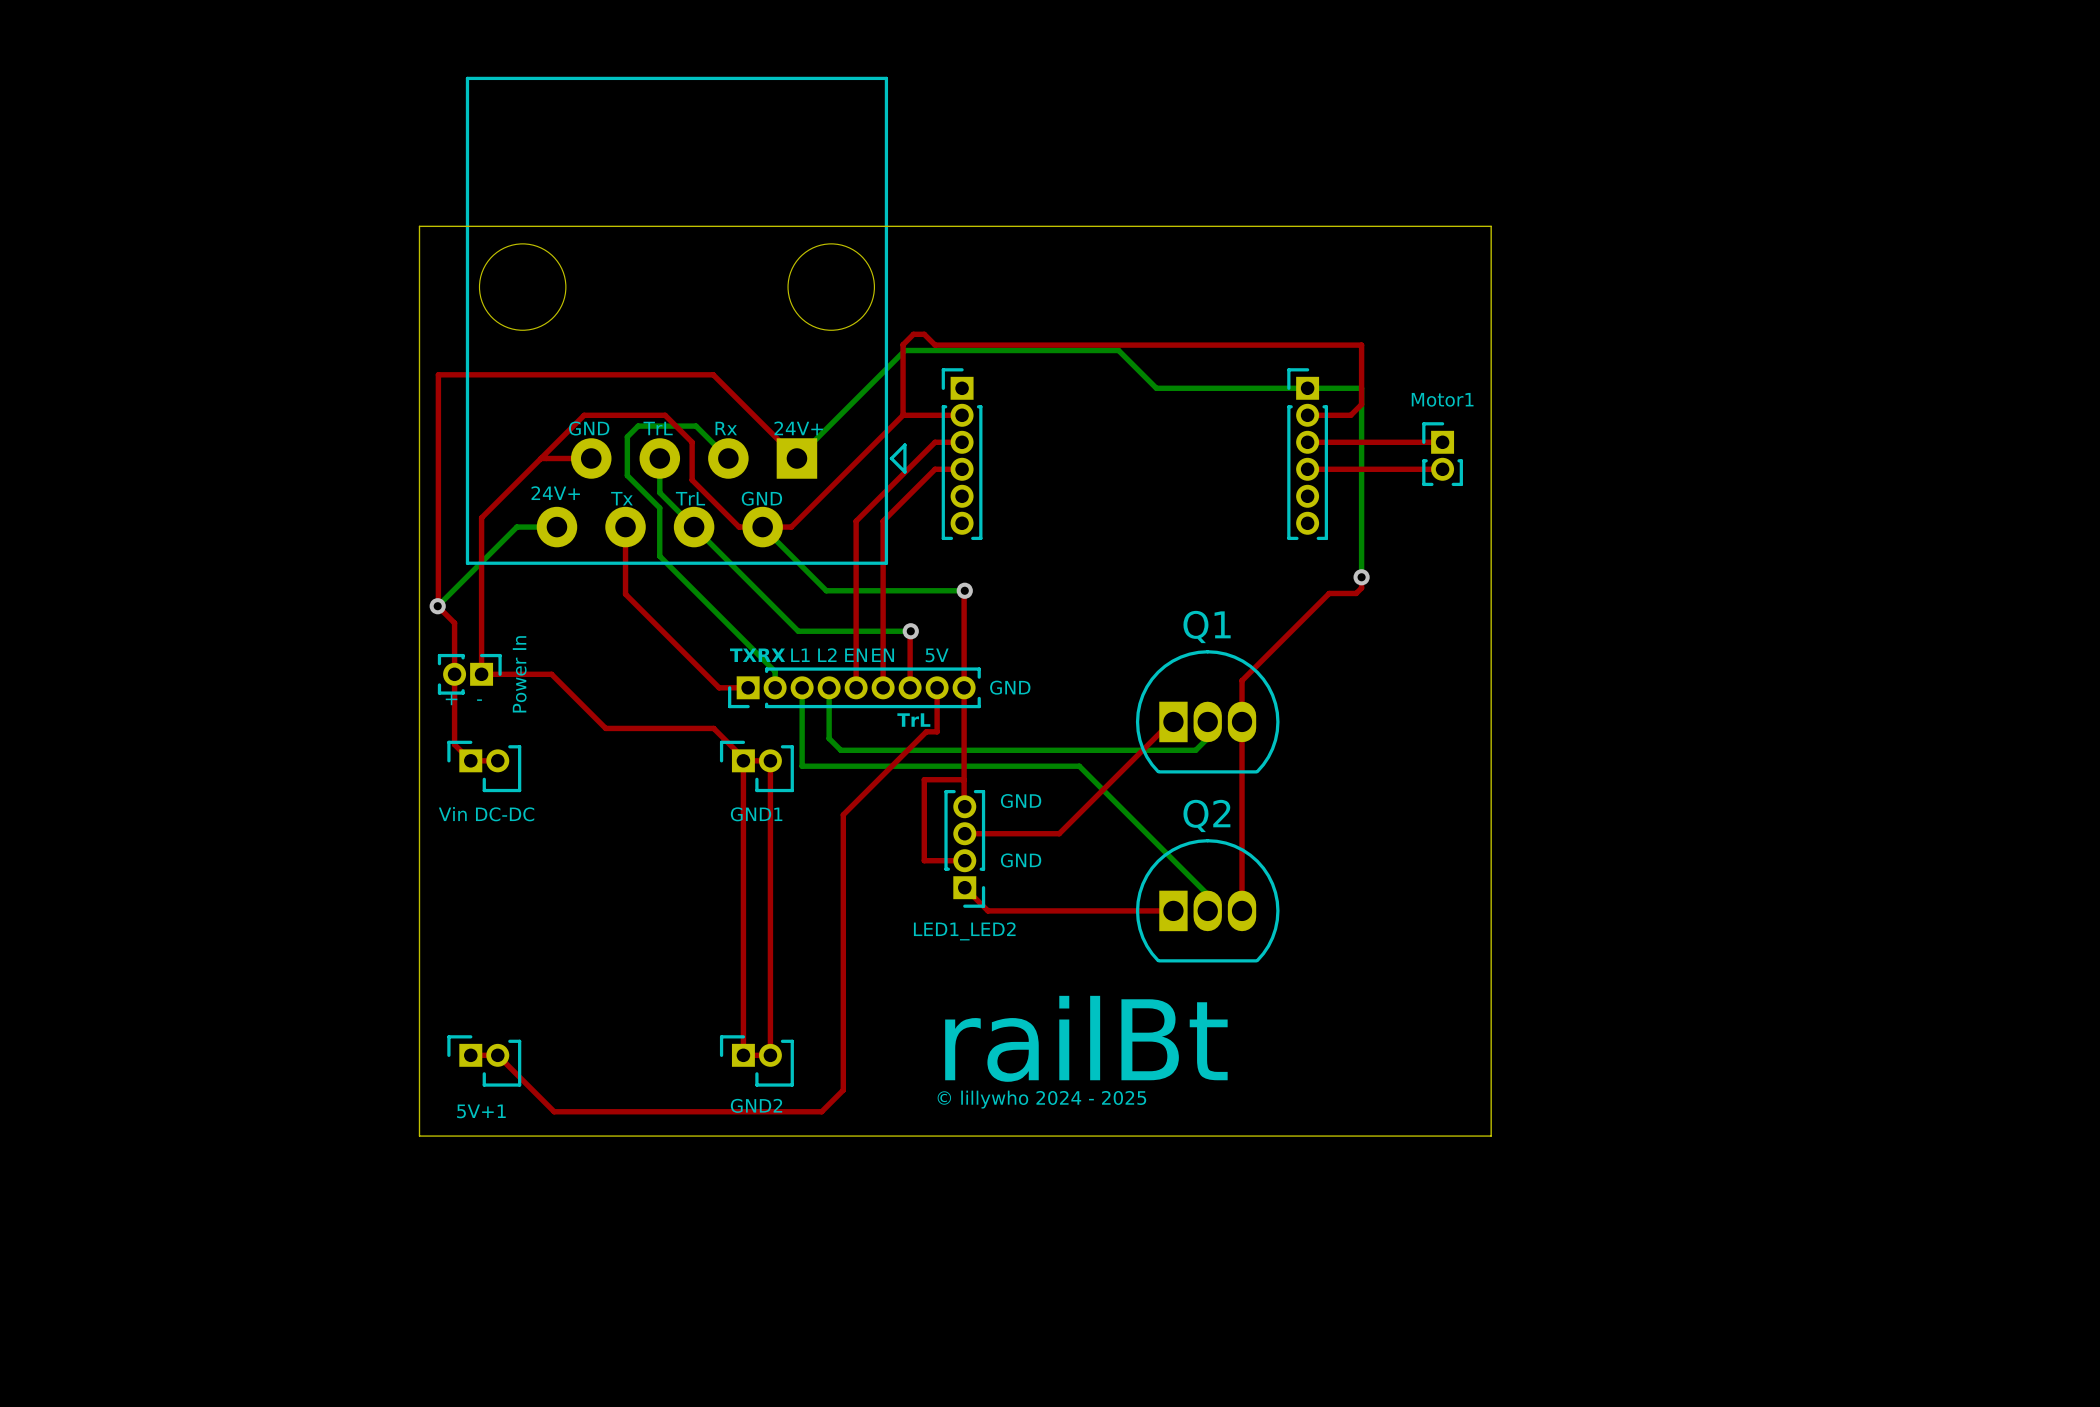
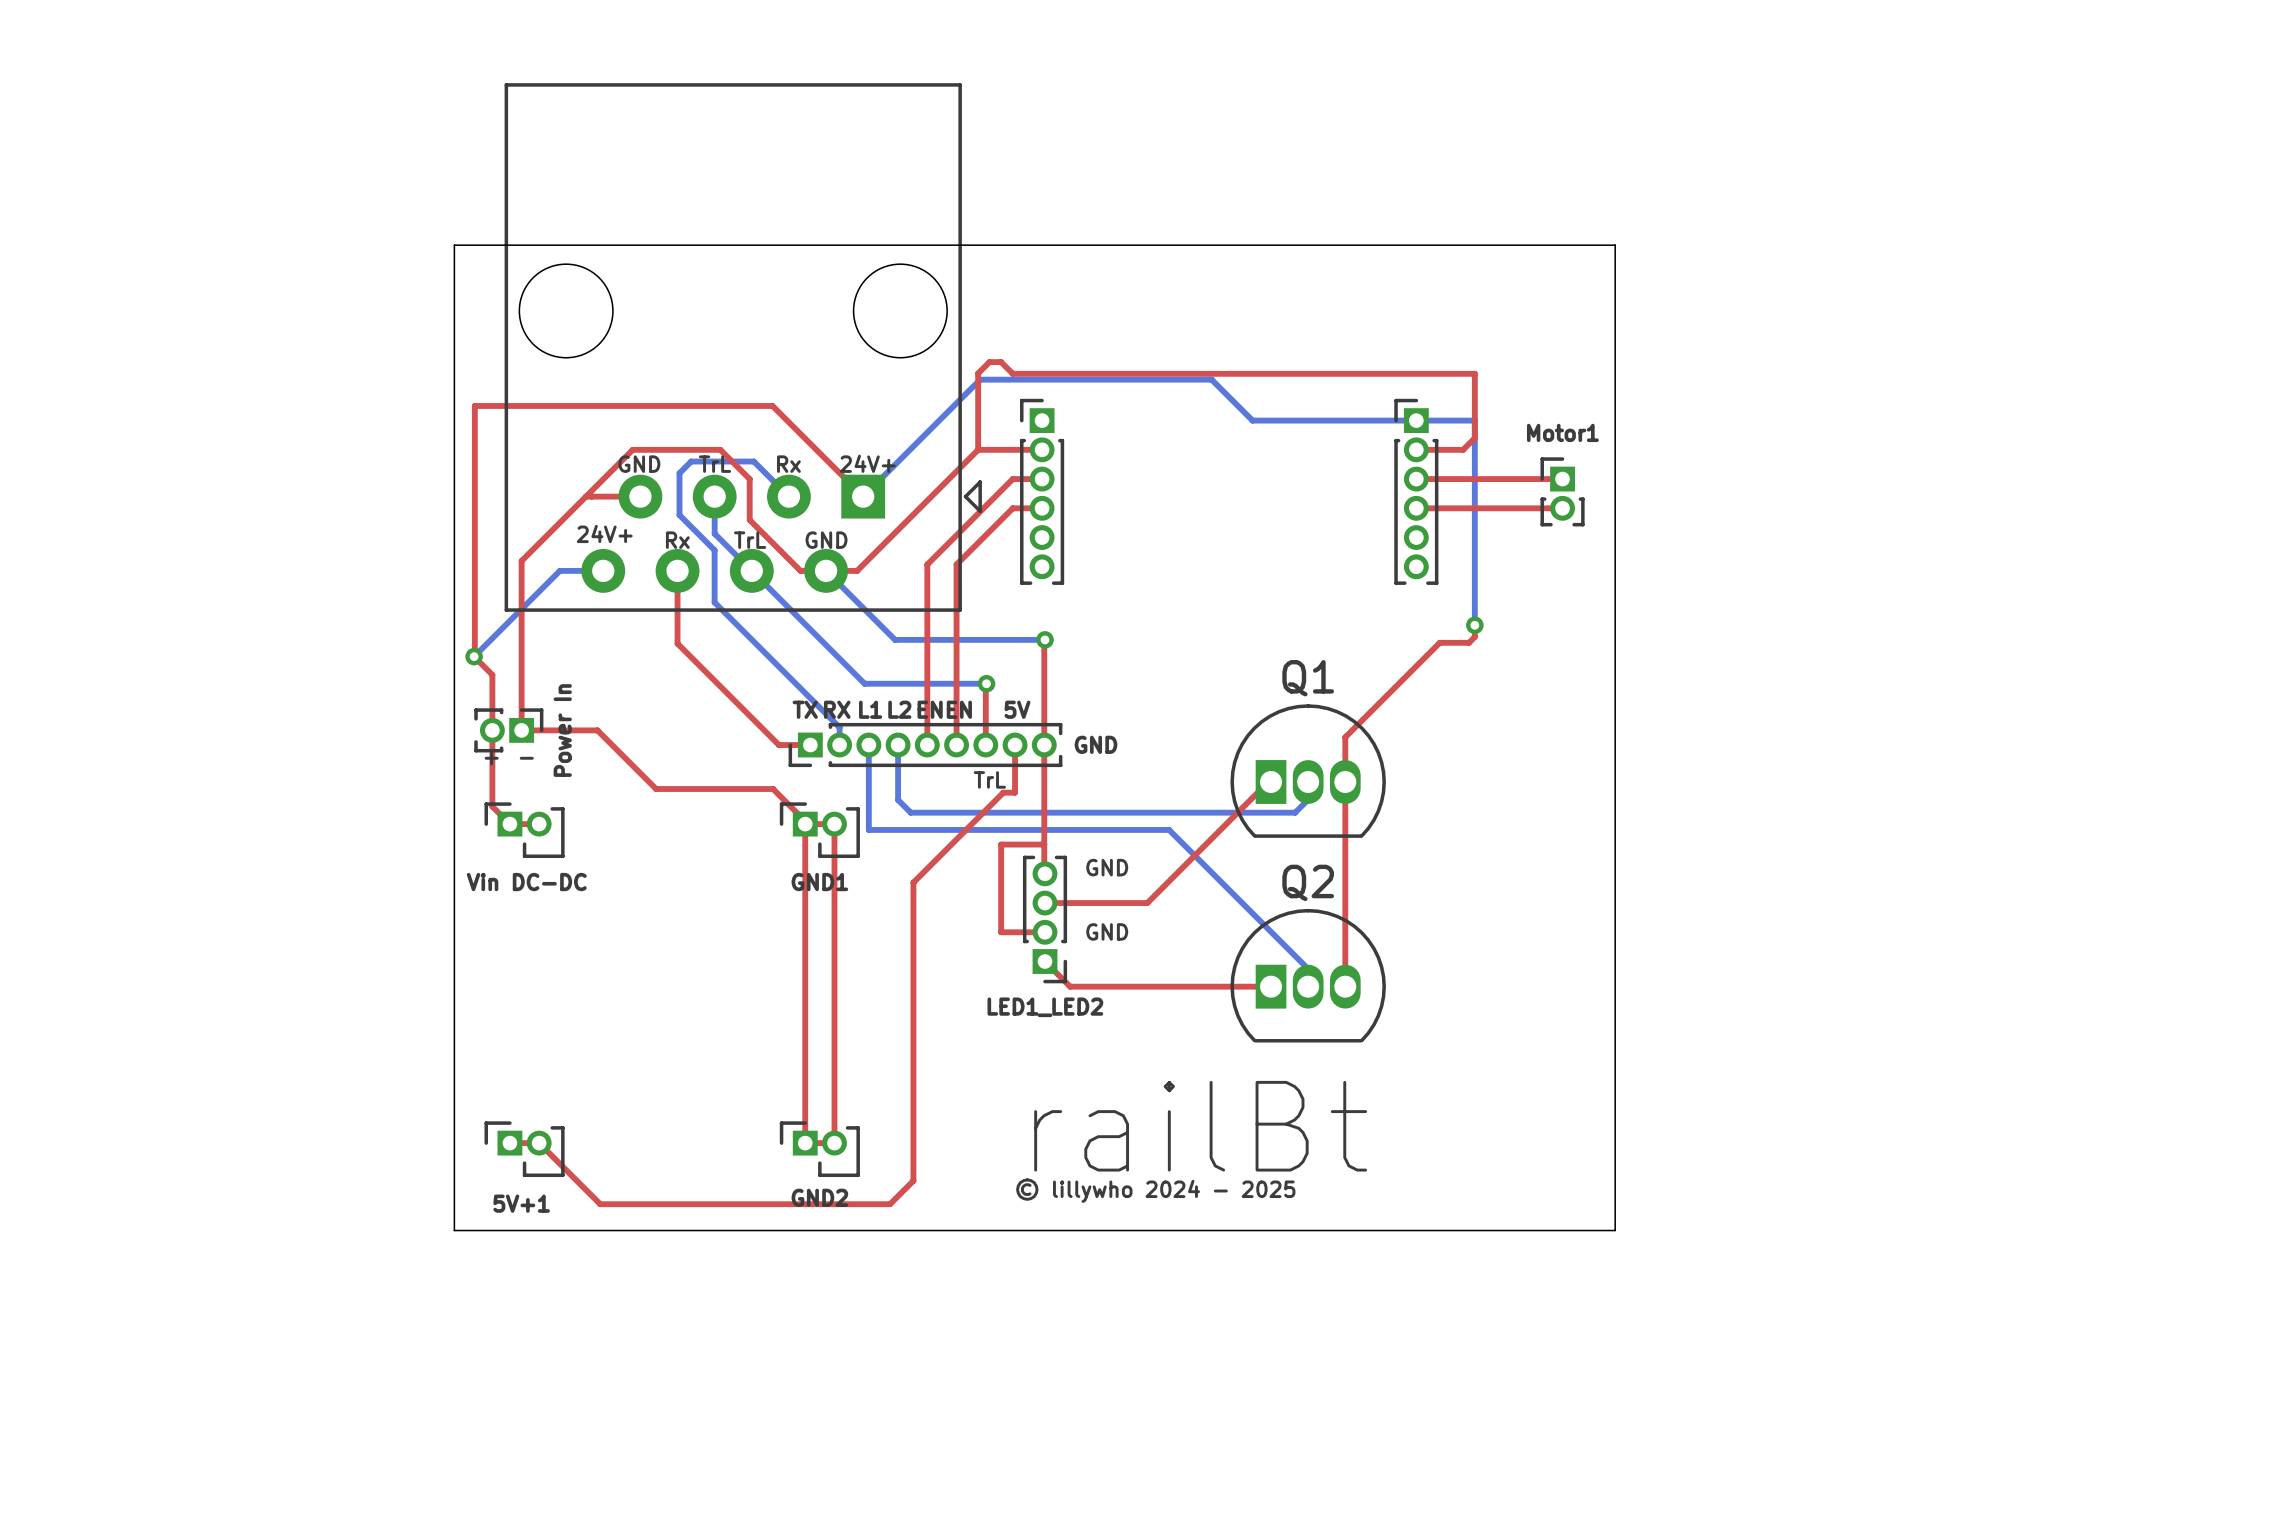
text: Tx (621, 498) -> Rx (677, 540)

